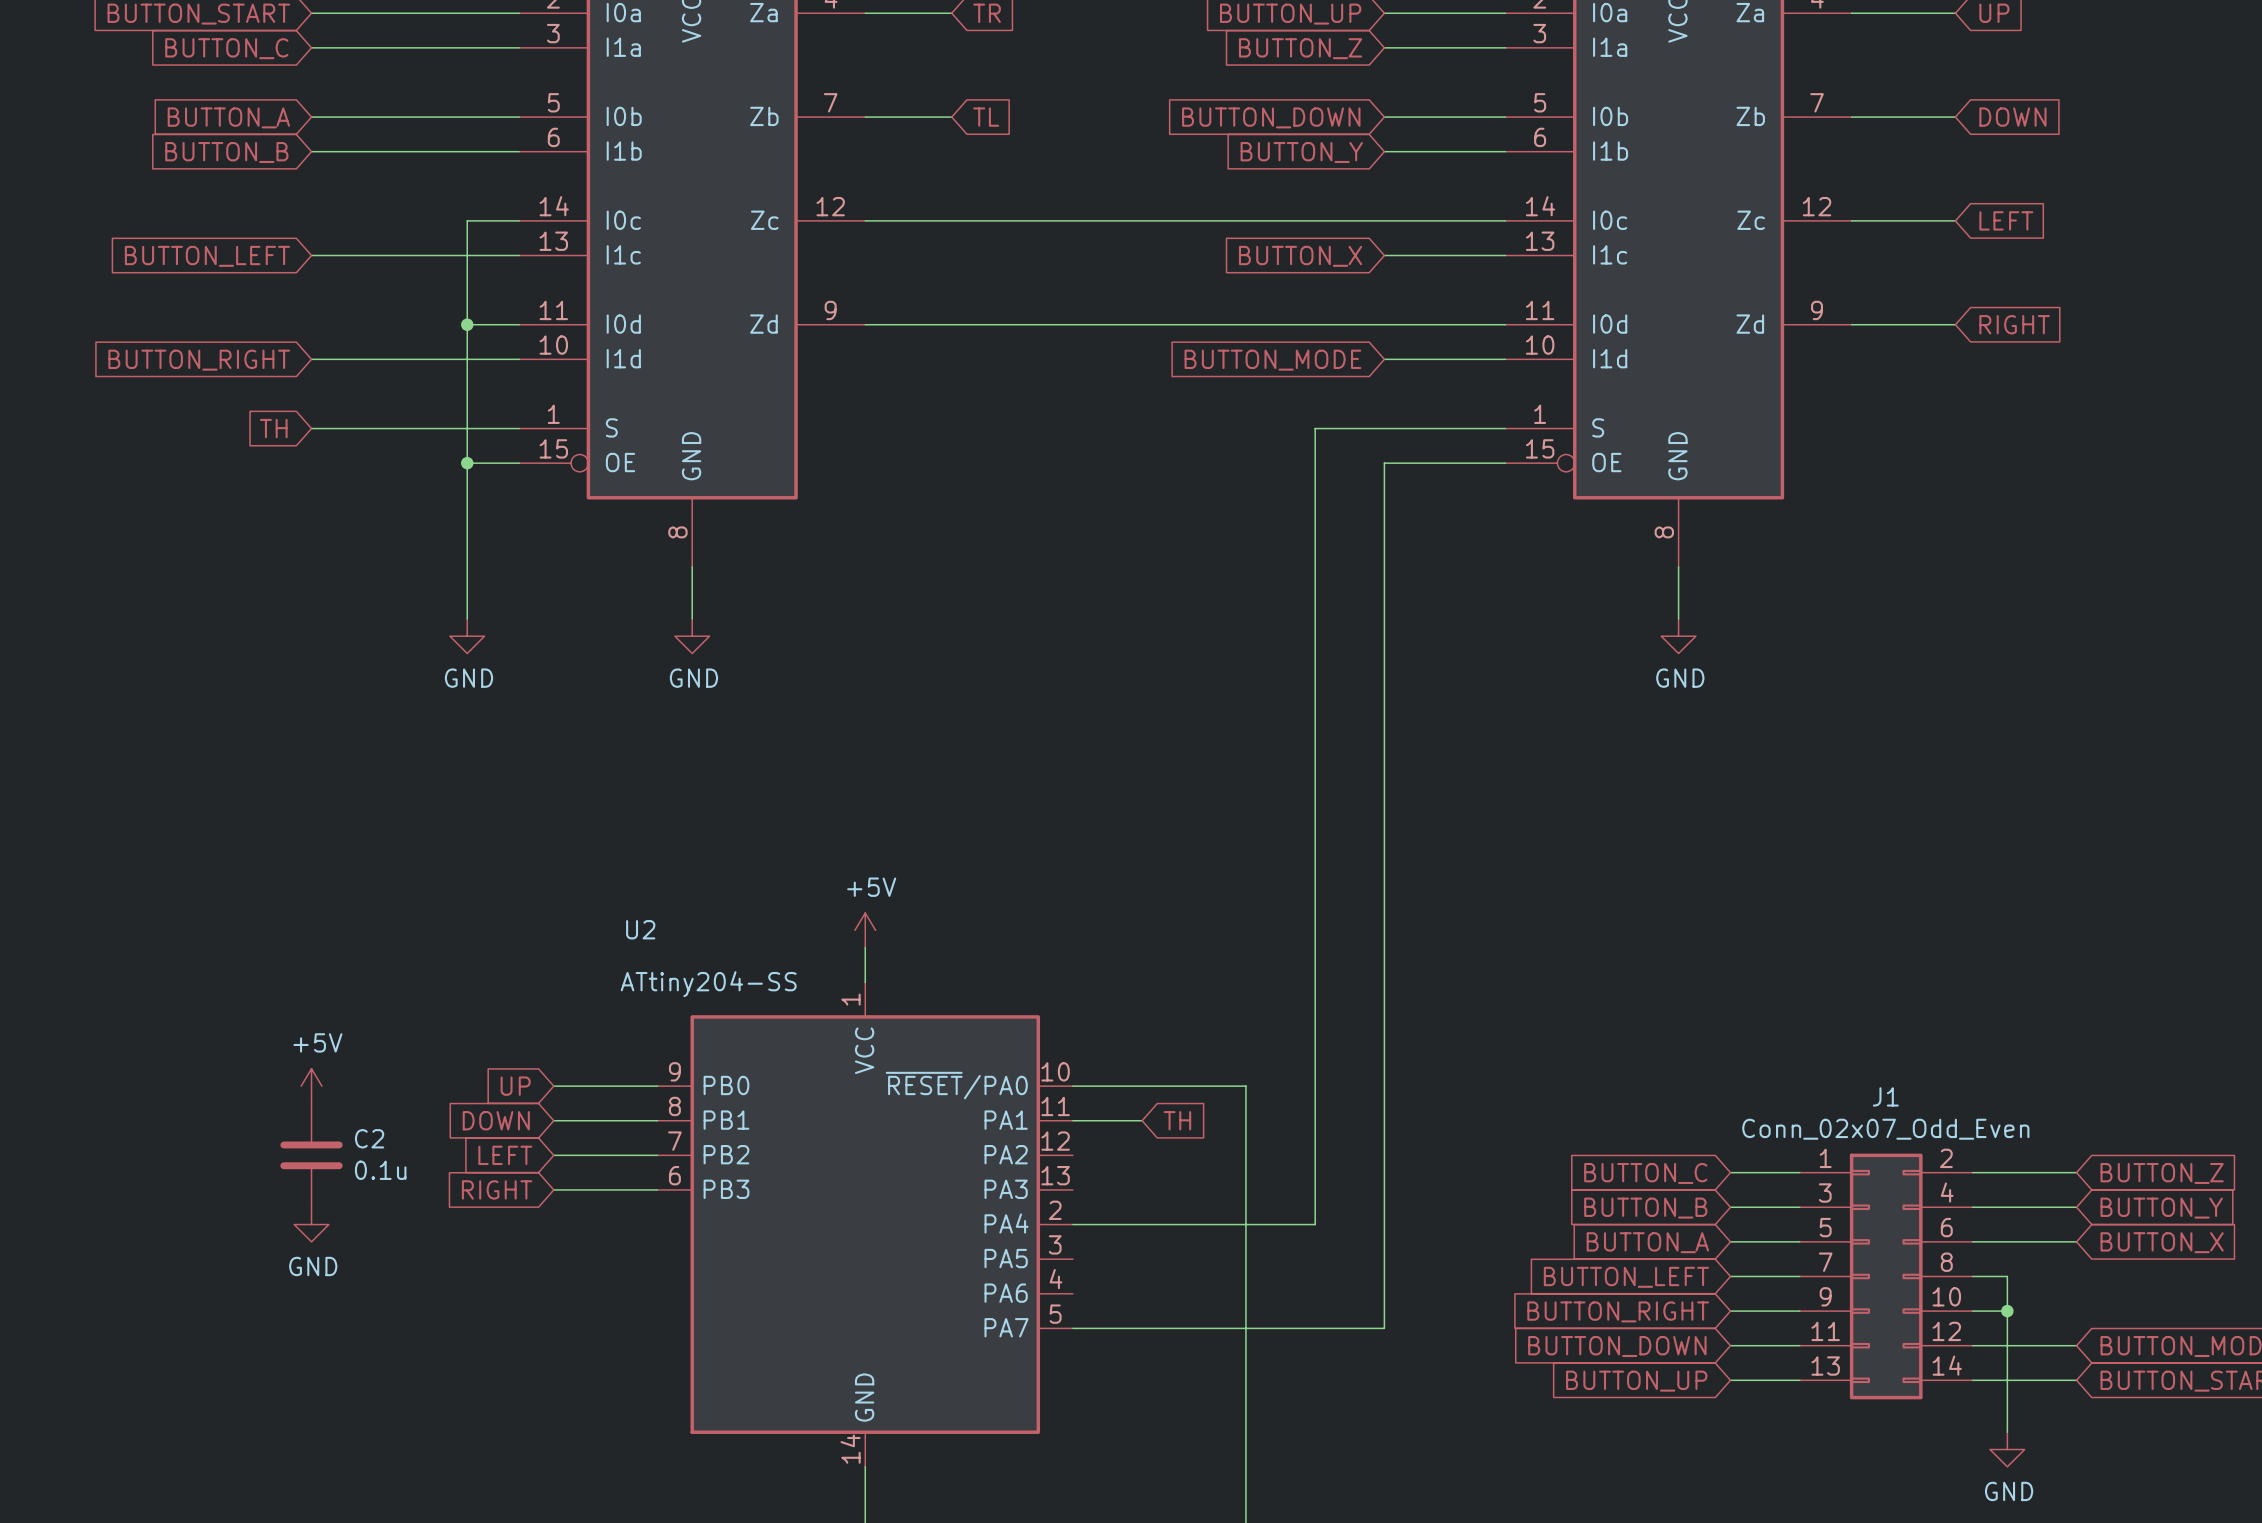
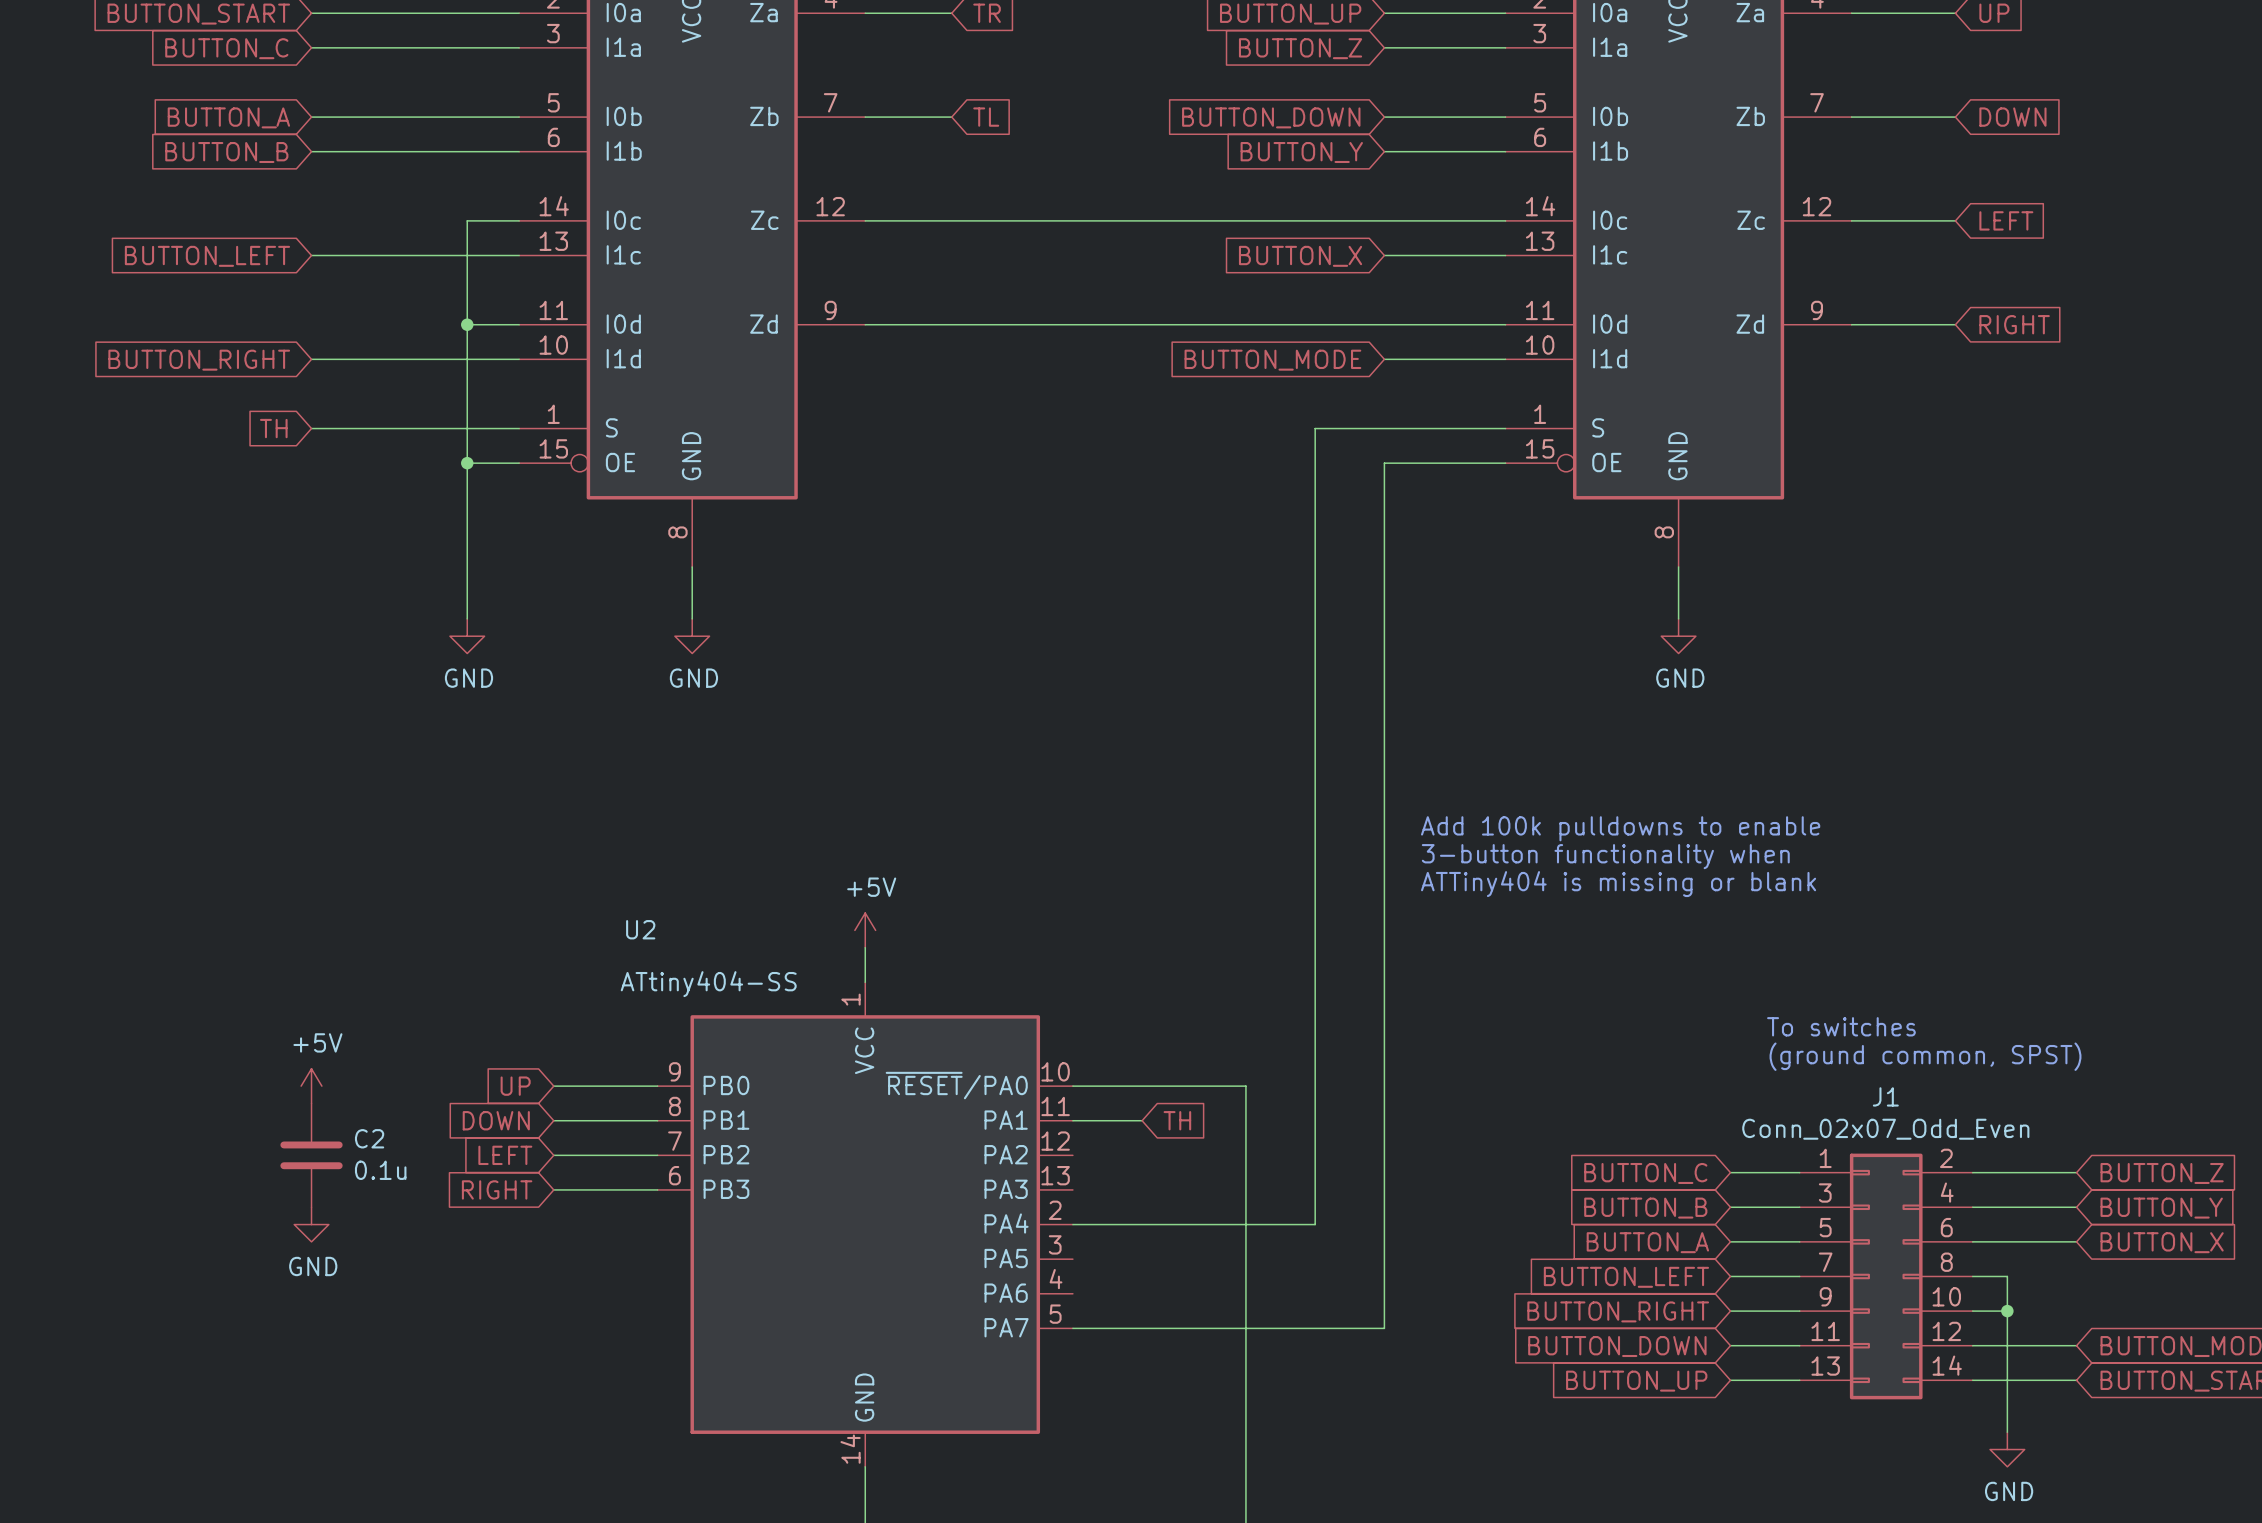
text: none -> Add 100k pulldowns to enable (1620, 828)
text: none -> 3-button functionality when (1605, 856)
text: none -> ATTiny404 is missing or blank (1618, 884)
U2 value: ATtiny204-SS (708, 984) -> ATtiny404-SS (708, 984)
text: none -> To switches (1841, 1026)
text: none -> (ground common, SPST) (1925, 1056)

